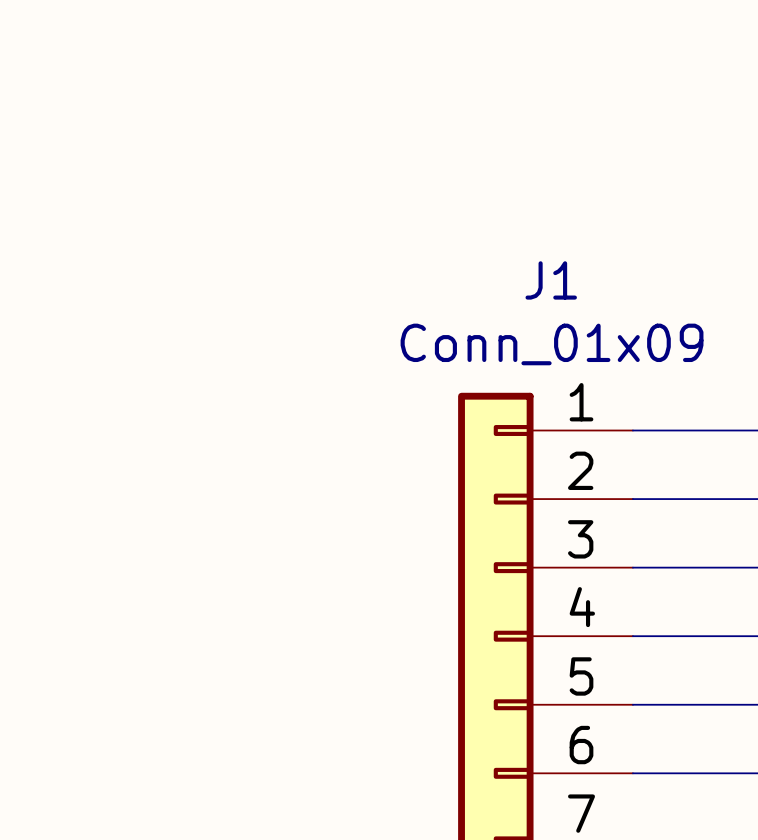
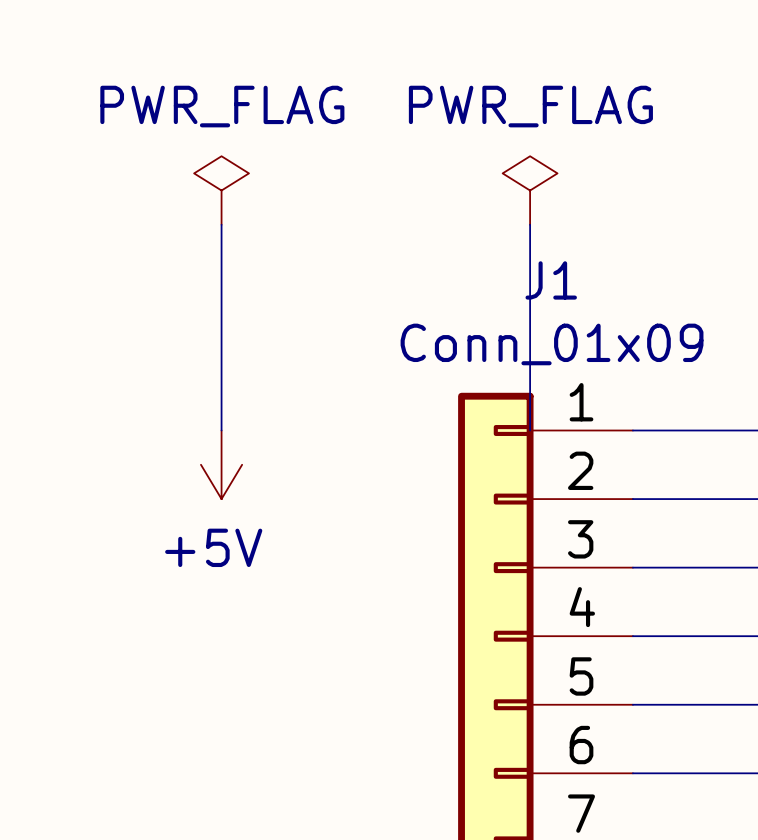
power symbol: none -> PWR_FLAG (221, 190)
power symbol: none -> PWR_FLAG (530, 190)
wire: none -> (221, 224) (221, 430)
wire: none -> (530, 224) (530, 430)
power symbol: none -> +5V (221, 464)

